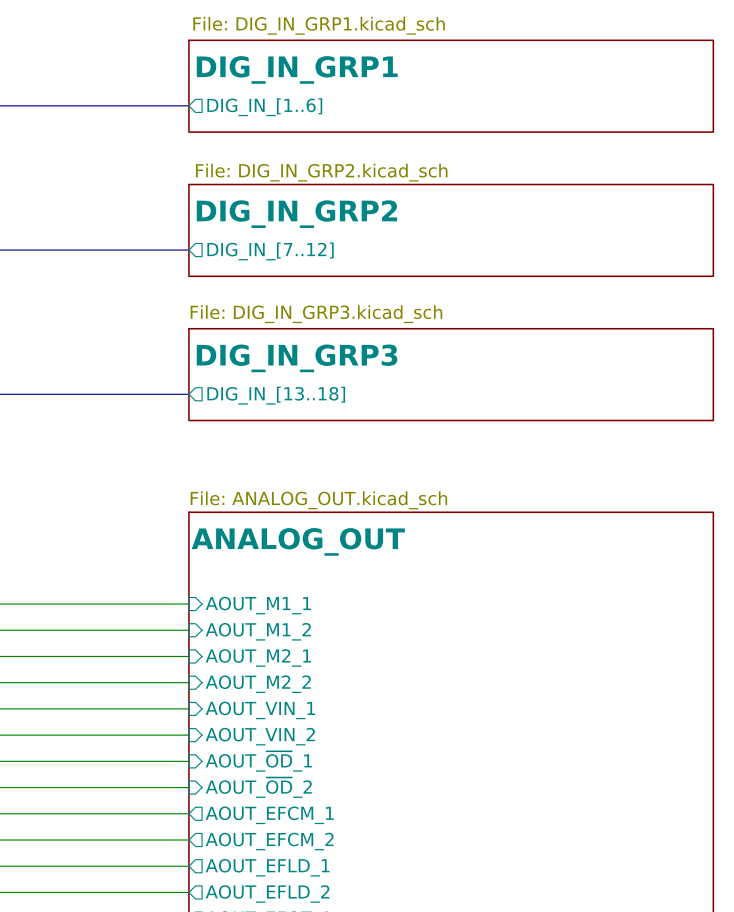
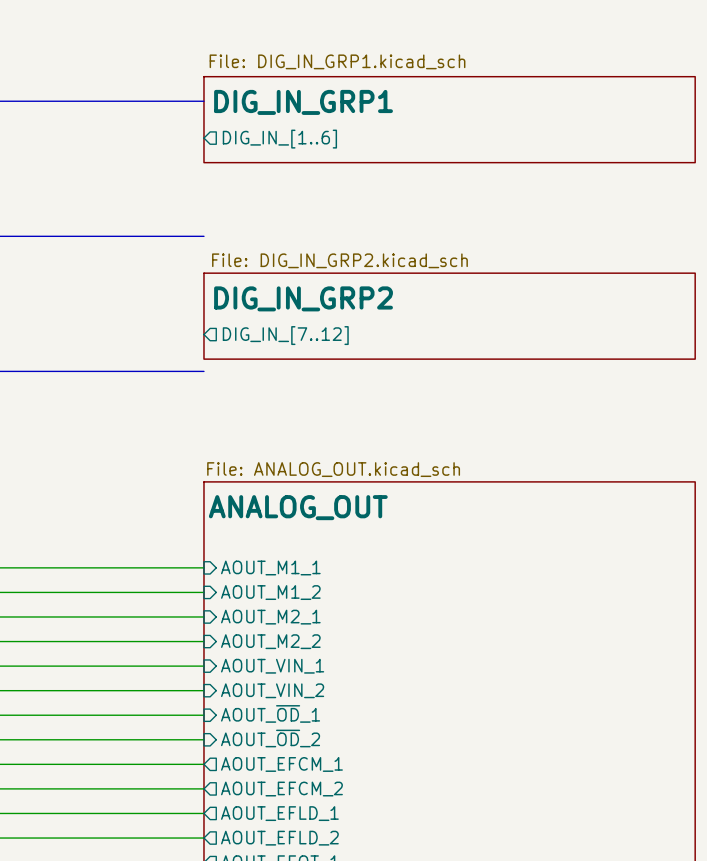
sheet DIG_IN_GRP1 position: (451, 86) -> (449, 119)
sheet pin position: DIG_IN_[1..6] (264, 107) -> DIG_IN_[1..6] (279, 139)
sheet DIG_IN_GRP2 position: (451, 230) -> (449, 316)
sheet pin position: DIG_IN_[7..12] (270, 251) -> DIG_IN_[7..12] (285, 335)
sheet DIG_IN_GRP3: File: DIG_IN_GRP3.kicad_sch (451, 374) -> none
sheet pin: DIG_IN_[13..18] (276, 395) -> none

